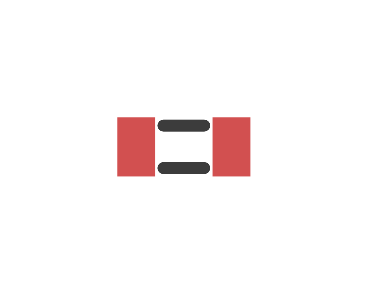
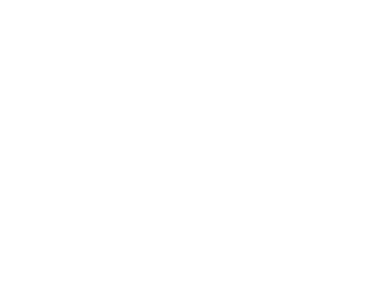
part: (183, 146) -> none

